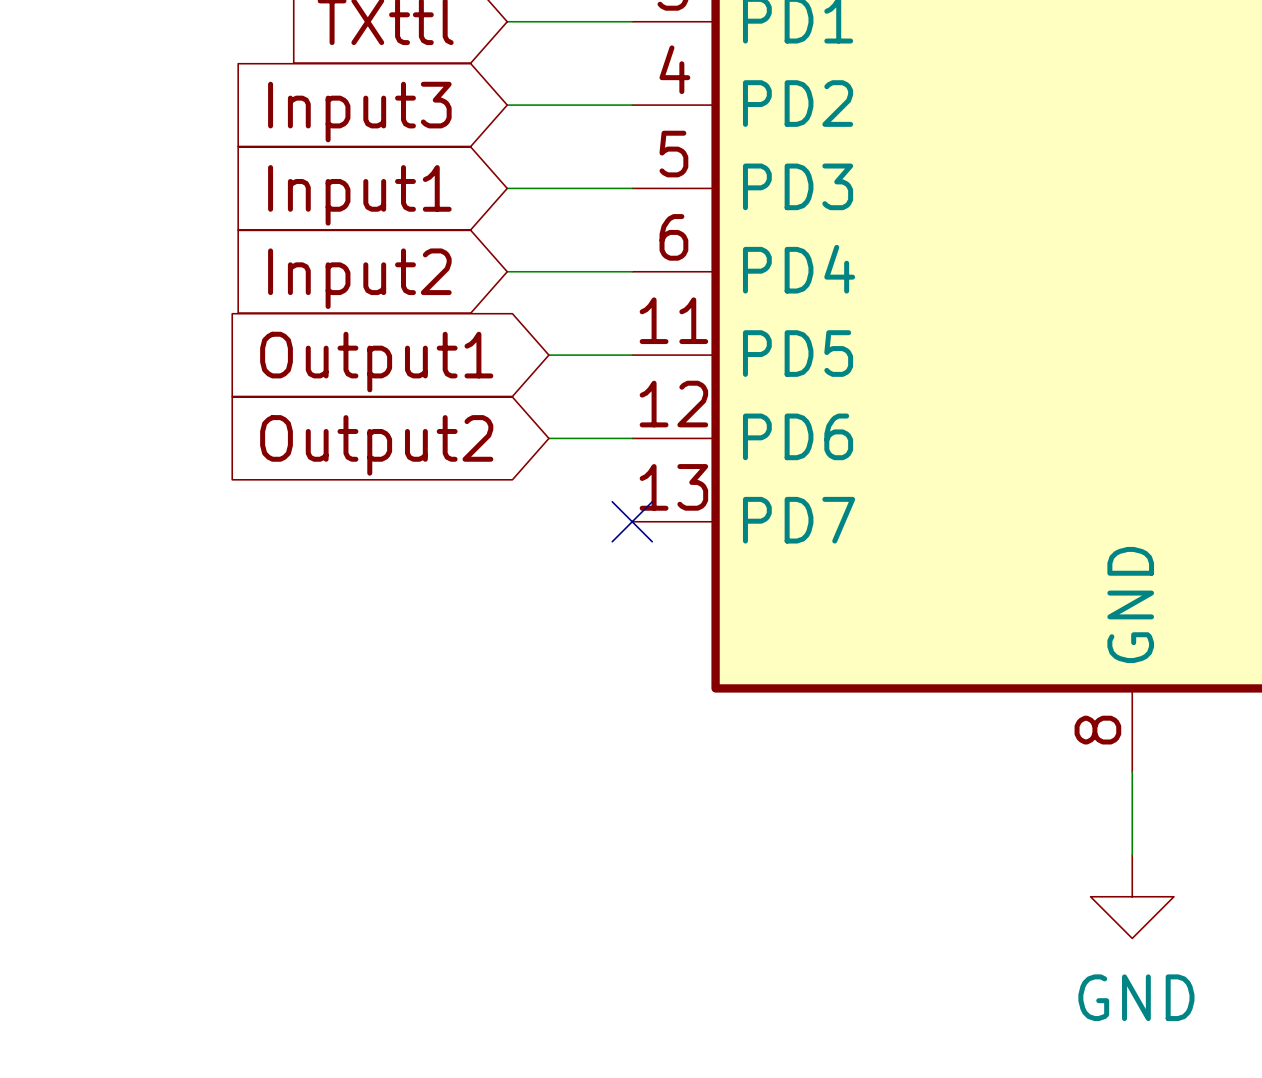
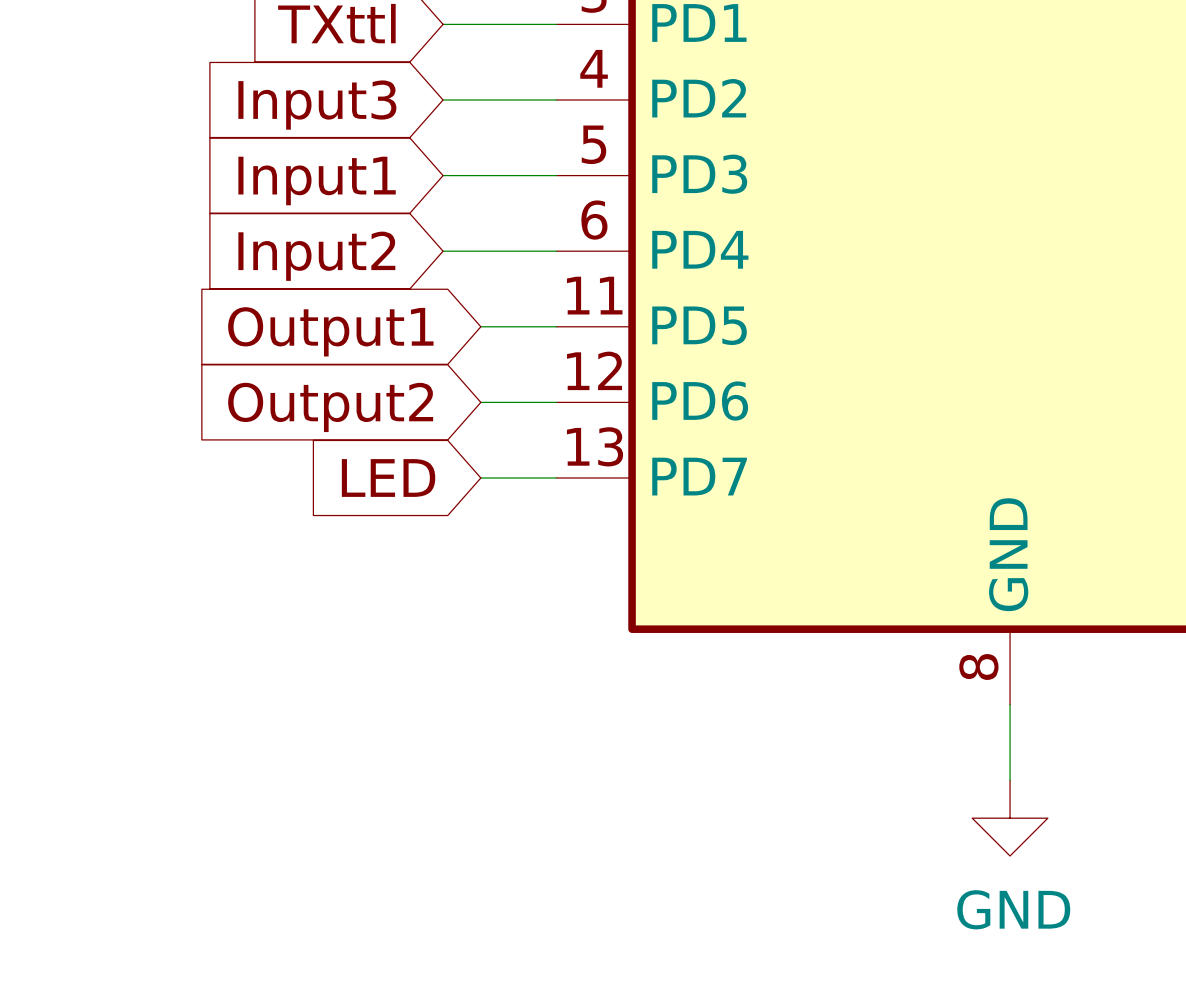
global label: none -> LED (388, 477)
wire: none -> (480, 477) (556, 477)
no-connect mark: (632, 521) -> none

